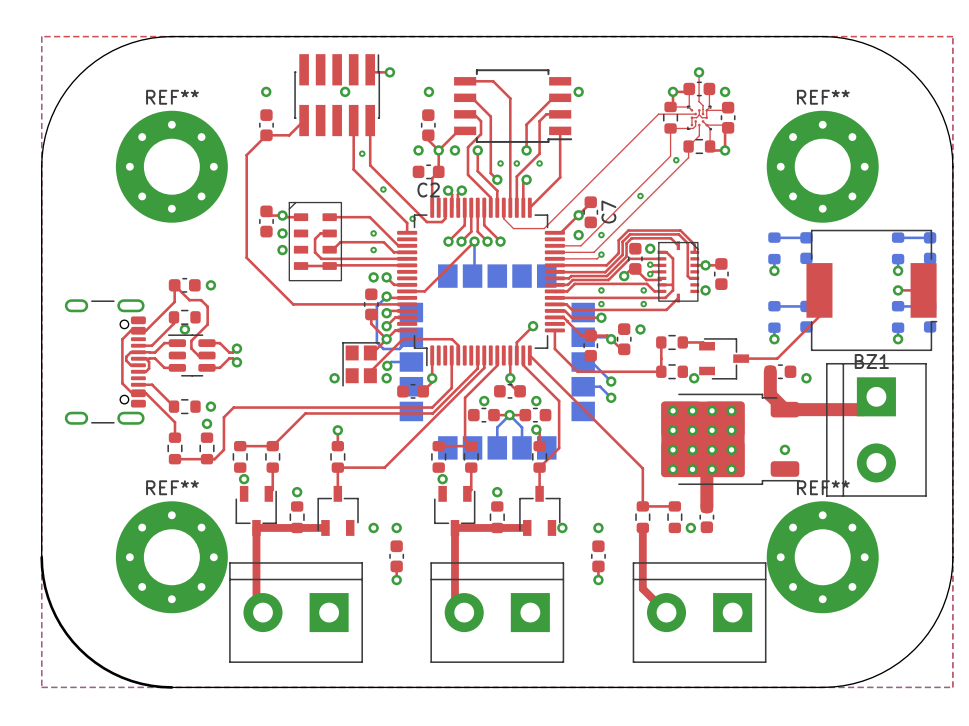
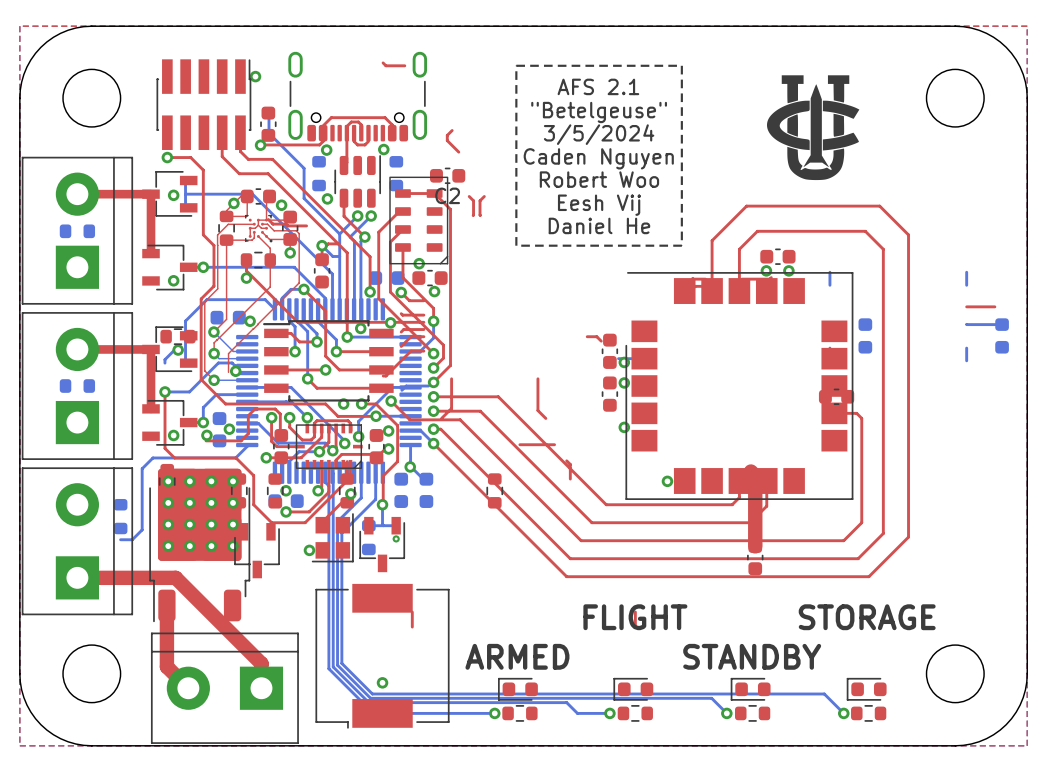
board edge: (171, 36) (151, 38) (122, 46) (95, 61) (79, 74) (66, 90) (51, 116) (43, 146) (41, 166) -> (163, 26) (75, 28) (60, 33) (40, 47) (26, 66) (21, 82) (19, 170)
board edge: (822, 36) (853, 40) (872, 46) (890, 55) (914, 74) (933, 98) (942, 116) (949, 136) (952, 166) -> (883, 26) (971, 28) (993, 37) (1006, 47) (1016, 59) (1025, 82) (1027, 170)
part footprint: [294, 54, 381, 137] -> [288, 51, 428, 142]
via: (389, 72) -> none
line: none -> (516, 65) (681, 65) (681, 245) (516, 245) (516, 65)
top track: (699, 72) (699, 101) (703, 105) (703, 114) -> none
via: (699, 72) -> none
round board edge: none -> [62, 68, 122, 128]
round board edge: none -> [925, 68, 985, 128]
drawing: none -> [766, 75, 860, 181]
top track: (465, 81) (493, 81) (510, 98) (510, 207) -> none
part: (699, 88) -> none
top track: (709, 88) (709, 107) (706, 110) -> none
via position: (266, 91) -> (255, 76)
via: (345, 91) -> none
via: (428, 91) -> none
text: none -> AFS 2.1 (598, 86)
via: (578, 91) -> none
via: (673, 91) -> none
via: (725, 91) -> none
top track: (465, 97) (471, 97) (490, 116) (490, 173) (497, 179) -> none
top track: (560, 97) (553, 97) (526, 124) (526, 150) -> none
part rotation: 0° (513, 106) -> 180° (328, 360)
part position: (513, 106) -> (328, 360)
part: none -> (203, 104)
top track: (689, 107) (689, 88) (686, 91) (673, 91) (673, 104) (670, 106) (688, 106) (691, 110) -> none
top track: (728, 107) (725, 110) (706, 110) -> none
top track: (699, 110) (699, 114) -> none
top track: (706, 110) (706, 117) (702, 117) (699, 114) -> none
top track: (465, 114) (474, 114) (481, 121) (481, 134) (468, 147) (468, 174) (490, 197) (490, 207) -> none
top track: (560, 114) (546, 114) (539, 121) (539, 153) (516, 176) (516, 207) -> none
text: none -> "Betelgeuse" (599, 112)
top track: (695, 114) (658, 114) (544, 228) (513, 228) (503, 218) (503, 207) -> none
top track: (699, 114) (696, 117) (691, 117) (691, 125) -> none
bottom track: none -> (269, 112) (269, 133) (304, 168) (304, 198) (339, 234)
part: (670, 117) -> none
part: (728, 117) -> none
part: (699, 118) -> none
top track: (304, 120) (289, 135) (266, 135) (246, 155) (246, 248) -> none
top track: (353, 120) (353, 169) (407, 223) (407, 232) -> none
top track: (370, 120) (370, 165) (426, 222) (441, 222) (445, 218) (445, 207) -> none
top track: (695, 121) (695, 126) (693, 128) (670, 128) (670, 156) (580, 245) (554, 245) -> none
top track: (703, 121) (710, 128) (710, 146) (714, 150) (725, 150) (725, 130) (728, 127) (725, 125) (706, 125) -> none
part side: top (428, 125) -> bottom (386, 278)
top track: (699, 125) (699, 135) (688, 146) (688, 157) (593, 252) (554, 252) -> none
top track: none -> (323, 125) (331, 117) (385, 117) (392, 124) (392, 133)
top track: (465, 130) (458, 130) (438, 150) (438, 171) (432, 178) (432, 207) -> none
top track: (560, 130) (560, 177) (529, 207) -> none
top track: none -> (222, 132) (222, 156) (239, 173) (268, 173) (347, 252) (347, 337)
top track: none -> (240, 132) (240, 151) (248, 159) (272, 159) (370, 256) (370, 291)
top track: none -> (323, 133) (323, 141) (319, 144) (260, 145)
top track: none -> (354, 133) (354, 141) (357, 144) (364, 144) (368, 141)
top track: none -> (361, 133) (361, 124) (358, 121) (351, 121) (346, 126) (346, 162) (344, 165)
text: none -> 3/5/2024 (599, 134)
via: none -> (260, 145)
part: (699, 146) -> none
via: none -> (326, 150)
via: none -> (383, 149)
via: (418, 150) -> none
via: (438, 150) -> none
via: (454, 150) -> none
top track: (477, 150) (477, 171) (497, 190) (497, 207) -> none
via: (477, 150) -> none
via: (526, 150) -> none
via: (725, 150) -> none
via: (362, 153) -> none
top track: none -> (167, 157) (190, 157) (203, 170) (203, 234) (213, 245) (213, 286) (201, 298) (201, 379) (225, 404) (325, 404) (338, 416) (375, 416)
via: none -> (167, 157)
text: none -> Caden Nguyen (598, 158)
via: (676, 160) -> none
via: (500, 163) -> none
via: (516, 163) -> none
via: (539, 163) -> none
REF**: (171, 166) -> none
REF**: (822, 166) -> none
part: none -> (396, 173)
text: none -> Robert Woo (599, 179)
bottom track: none -> (185, 180) (185, 207)
via: (497, 179) -> none
top track: (526, 179) (523, 183) (523, 207) -> none
via: (526, 179) -> none
top track: none -> (402, 193) (434, 193) (450, 209) (450, 365) (433, 382)
top track: none -> (77, 194) (151, 194) (151, 253)
part: none -> (169, 193)
bottom track: none -> (185, 194) (252, 194) (332, 274) (332, 309)
via: none -> (173, 195)
via: (383, 189) -> none
top track: none -> (240, 196) (226, 210) (226, 216) (247, 215) (247, 196) (240, 196)
part: none -> (258, 196)
top track: none -> (269, 196) (266, 199) (266, 220)
via: (448, 190) -> none
via: (461, 190) -> none
via: none -> (327, 198)
top track: none -> (344, 198) (344, 216) (364, 237)
via: none -> (233, 203)
via: (640, 196) -> none
via: none -> (281, 205)
text: none -> Eesh Vij (599, 205)
top track: (590, 202) (560, 232) (554, 232) -> none
top track: none -> (402, 211) (399, 211) (378, 232) (378, 298) (433, 353)
part footprint: [259, 205, 274, 238] -> [245, 214, 273, 243]
top track: (464, 207) (464, 225) (448, 241) -> none
top track: (471, 207) (471, 231) (461, 241) -> none
top track: (477, 207) (477, 231) (487, 241) -> none
top track: (484, 207) (484, 225) (500, 241) -> none
bottom track: none -> (357, 216) (339, 234)
via: none -> (357, 216)
bottom track: none -> (371, 216) (350, 237) (354, 241) (354, 309)
via: none -> (371, 216)
top track: none -> (290, 217) (287, 220) (258, 220) (258, 225)
C7: (590, 212) -> none
top track: none -> (254, 224) (228, 224) (217, 235) (217, 245)
top track: none -> (262, 224) (267, 224) (274, 230) (296, 230) (299, 233) (299, 282) (228, 353) (228, 372)
via: (282, 215) -> none
via: (578, 215) -> none
top track: none -> (258, 225) (261, 228) (266, 228)
top track: none -> (258, 225) (255, 228) (250, 228) (250, 236)
top track: (329, 217) (369, 217) (398, 245) (407, 245) -> none
text: none -> Daniel He (599, 225)
via: (412, 218) -> none
part: none -> (226, 228)
part: none -> (290, 228)
top track: none -> (402, 229) (390, 242) (390, 292) (443, 345) (443, 358) (433, 368)
part: none -> (77, 230)
part: none -> (77, 231)
top track: none -> (254, 232) (254, 237) (252, 240) (226, 240) (226, 319) (213, 332)
top track: none -> (262, 232) (269, 239) (290, 239) (290, 252)
bottom track: none -> (339, 234) (339, 309)
top track: none -> (258, 236) (270, 248) (270, 286) (217, 339)
via: none -> (364, 237)
bottom track: none -> (360, 241) (360, 309)
via: (282, 233) -> none
via: (373, 233) -> none
top track: none -> (217, 245) (217, 288) (204, 301) (204, 370) (214, 380)
bottom track: none -> (322, 245) (332, 256) (339, 256)
via: none -> (322, 245)
via: (578, 235) -> none
via: (601, 235) -> none
top track: none -> (402, 247) (402, 277) (433, 308) (433, 321)
bottom track: (774, 237) (806, 237) -> none
bottom track: (898, 237) (930, 237) -> none
via: none -> (290, 252)
part rotation: 0° (315, 241) -> 180° (418, 220)
part position: (315, 241) -> (418, 220)
via: (448, 241) -> none
via: (461, 241) -> none
top track: (474, 241) (424, 291) (407, 291) -> none
bottom track: (474, 241) (474, 274) (472, 276) -> none
via: (474, 241) -> none
via: (487, 241) -> none
via: (500, 241) -> none
top track: (678, 245) (671, 238) (631, 238) (626, 243) (626, 256) (606, 276) (571, 276) (568, 278) (554, 278) -> none
top track: (315, 247) (315, 252) (321, 258) (407, 258) -> none
part: none -> (258, 260)
via: (650, 248) -> none
part: (774, 248) -> none
part: (806, 248) -> none
part: (898, 248) -> none
part: (930, 248) -> none
top track: (329, 249) (332, 249) (340, 242) (383, 242) (393, 252) (407, 252) -> none
via: (282, 250) -> none
via: (373, 250) -> none
via: none -> (419, 263)
top track: (661, 252) (666, 252) (673, 258) (673, 290) (665, 297) (554, 297) -> none
top track: (694, 252) (694, 244) (680, 230) (628, 230) (618, 240) (618, 253) (606, 265) (554, 265) -> none
part: none -> (169, 267)
bottom track: none -> (185, 267) (294, 267) (325, 298) (325, 309)
via: none -> (203, 267)
top track: (601, 254) (597, 258) (554, 258) -> none
via: (601, 254) -> none
part: none -> (322, 270)
via: none -> (788, 270)
part: (635, 258) -> none
top track: (661, 258) (629, 258) (608, 279) (572, 279) (567, 284) (554, 284) -> none
via: none -> (246, 278)
part: none -> (430, 278)
via: (650, 264) -> none
top track: (407, 265) (301, 265) -> none
via position: (705, 265) -> (766, 270)
via: none -> (173, 280)
via: (774, 270) -> none
via: (898, 270) -> none
top track: (547, 271) (605, 272) (622, 254) (622, 241) (630, 234) (678, 234) (687, 243) (687, 276) (694, 278) -> none
part: (678, 271) -> none
top track: none -> (303, 289) (325, 311) (325, 356) (339, 369) (381, 369)
bottom track: none -> (303, 289) (290, 289) (282, 298) (282, 309)
via: none -> (303, 289)
via: (650, 274) -> none
part rotation: 0° (721, 274) -> 90° clockwise (777, 256)
part position: (721, 274) -> (777, 256)
via: none -> (370, 291)
via: none -> (434, 291)
top track: (624, 276) (631, 268) (635, 268) (646, 279) (661, 278) -> none
via: (624, 276) -> none
top track: none -> (712, 291) (712, 240) (746, 206) (879, 206) (908, 234) (908, 537) (868, 576) (566, 576) (433, 443)
top track: none -> (739, 291) (739, 249) (757, 231) (865, 231) (883, 249) (883, 533) (858, 558) (570, 558) (440, 429) (433, 429)
via: (373, 277) -> none
part side: top (481, 282) -> bottom (328, 391)
top track: (661, 284) (672, 284) -> none
part: (184, 285) -> none
via: (210, 285) -> none
via: (601, 290) -> none
via: (643, 290) -> none
via: (705, 290) -> none
top track: (819, 290) (819, 316) (777, 358) (741, 358) -> none
BZ1: (871, 290) -> none
via: (898, 290) -> none
top track: (661, 291) (654, 291) (646, 283) (574, 283) (567, 291) (555, 292) -> none
bottom track: none -> (274, 309) (265, 299) (206, 299) (185, 321) (185, 363)
bottom track: none -> (289, 309) (289, 320) (295, 326) (295, 351)
bottom track: none -> (296, 309) (296, 320) (307, 331) (307, 378)
bottom track: none -> (303, 309) (303, 320) (317, 333) (317, 341)
bottom track: none -> (318, 309) (318, 321) (336, 339) (336, 351)
bottom track: (386, 296) (376, 306) (376, 342) (383, 348) (399, 348) (411, 337) -> none
via: (386, 296) -> none
top track: (678, 298) (666, 309) (572, 309) (566, 304) (554, 304) -> none
part: none -> (228, 317)
via: none -> (250, 321)
bottom track: none -> (433, 321) (433, 338) (420, 351) (410, 351)
via: none -> (433, 321)
part side: top (371, 304) -> bottom (401, 490)
via: none -> (390, 322)
via: (601, 304) -> none
via: (643, 304) -> none
bottom track: (774, 306) (806, 306) -> none
via: none -> (360, 328)
top track: (554, 310) (564, 310) (571, 317) (601, 317) -> none
bottom track: none -> (213, 332) (233, 351) (247, 351)
via: none -> (213, 332)
via: (386, 313) -> none
top track: none -> (276, 333) (291, 333) (299, 341) (317, 341)
top track: (371, 314) (371, 323) (386, 339) -> none
bottom track: none -> (347, 335) (410, 337)
part: (774, 316) -> none
part: (898, 316) -> none
top track: (174, 317) (174, 323) (151, 345) (138, 345) -> none
via: none -> (347, 337)
via: (601, 317) -> none
top track: none -> (217, 339) (214, 342) (214, 353)
top track: (567, 321) (581, 335) (607, 335) (621, 349) (624, 349) -> none
via: none -> (317, 341)
via: (386, 326) -> none
top track: (533, 326) (516, 342) (516, 355) -> none
via: (533, 326) -> none
top track: none -> (77, 349) (151, 349) (151, 408)
part: none -> (169, 349)
bottom track: none -> (174, 350) (164, 359) (164, 363)
via: (640, 329) -> none
via: none -> (295, 351)
top track: none -> (336, 351) (381, 351)
via: none -> (336, 351)
top track: (554, 330) (554, 348) (577, 371) (661, 371) (661, 342) -> none
part: none -> (609, 351)
bottom track: none -> (214, 353) (219, 358) (247, 358)
via: none -> (214, 353)
via: none -> (433, 353)
via: (386, 339) -> none
via: (611, 339) -> none
part: (624, 339) -> none
via: (774, 339) -> none
via: (898, 339) -> none
via: none -> (624, 362)
part: (672, 342) -> none
top track: (682, 342) (703, 342) (707, 346) -> none
top track: (177, 343) (164, 343) (154, 352) (130, 352) (126, 356) (126, 360) (130, 365) (138, 365) -> none
top track: (206, 343) (219, 343) (229, 352) (233, 352) (236, 348) -> none
bottom track: none -> (247, 365) (218, 362) (189, 391) (165, 391)
via: none -> (433, 368)
part: (590, 345) -> none
top track: none -> (276, 369) (325, 369)
via: none -> (325, 369)
part rotation: 0° (191, 355) -> 90° clockwise (357, 181)
part position: (191, 355) -> (357, 181)
top track: (206, 355) (198, 355) (191, 348) (191, 340) (207, 324) (207, 306) (201, 300) (189, 300) (174, 285) (174, 301) (145, 330) (130, 330) (122, 339) (122, 383) (132, 393) (145, 393) (174, 422) (174, 437) -> none
top track: none -> (307, 378) (317, 388) (381, 388)
via: none -> (307, 378)
top track: (451, 355) (451, 388) (432, 407) (233, 407) (223, 417) (223, 449) (214, 459) (174, 459) -> none
top track: (458, 355) (458, 345) (452, 339) (402, 339) (370, 371) (370, 375) -> none
top track: (477, 355) (477, 368) (432, 413) (305, 413) (272, 446) (240, 446) -> none
top track: (484, 355) (484, 368) (384, 467) (337, 467) (337, 493) -> none
top track: (497, 355) (497, 365) (465, 397) (465, 439) (471, 446) (438, 446) -> none
top track: (523, 355) (523, 365) (559, 401) (559, 448) (539, 467) (539, 493) -> none
top track: (529, 355) (642, 468) (642, 506) (674, 506) -> none
bottom track: none -> (214, 380) (247, 380)
via: none -> (214, 380)
top track: (138, 358) (154, 358) (164, 367) (177, 367) -> none
top track: (145, 358) (149, 361) (149, 368) (145, 371) (138, 371) -> none
via: none -> (433, 382)
part: (724, 358) -> none
via: none -> (624, 382)
part: none -> (77, 386)
part: none -> (77, 386)
part: (105, 362) -> none
top track: (236, 362) (233, 358) (229, 358) (219, 367) (206, 367) -> none
via: (236, 362) -> none
part side: bottom (497, 362) -> top (739, 386)
bottom track: (583, 362) (591, 362) (611, 381) -> none
bottom track: none -> (247, 387) (291, 387) (344, 441) (344, 443)
bottom track: none -> (410, 387) (392, 387) (358, 421) (358, 436)
part rotation: 0° (361, 364) -> 180° (332, 537)
part position: (361, 364) -> (332, 537)
via: (387, 365) -> none
top track: none -> (165, 391) (165, 448) (174, 457) (236, 457) (253, 475) (253, 504) (271, 522) (305, 522) (350, 477) (350, 464)
via: none -> (165, 391)
bottom track: none -> (247, 394) (216, 394) (203, 407) (203, 422) (188, 422)
part: none -> (609, 394)
top track: none -> (433, 396) (498, 396) (606, 504) (732, 504) (739, 497) (739, 481)
via: none -> (433, 396)
part: (672, 371) -> none
top track: (770, 371) (770, 394) (784, 409) (863, 409) (876, 396) -> none
top track: none -> (391, 401) (409, 419) (460, 419) (581, 540) (843, 540) (861, 522) (861, 418) (856, 413) (834, 413)
via: none -> (391, 401)
bottom track: none -> (247, 401) (291, 401) (307, 417)
top track: none -> (361, 404) (376, 404) (397, 425) (397, 461) (383, 475) (383, 504)
via: none -> (361, 404)
via: (386, 378) -> none
via: (432, 378) -> none
via: (510, 378) -> none
via: (694, 378) -> none
via: (806, 378) -> none
via: (611, 381) -> none
top track: (138, 384) (152, 384) (174, 406) -> none
top track: none -> (433, 411) (480, 411) (591, 522) (750, 522) (766, 506) (766, 478)
via: none -> (433, 411)
bottom track: (583, 386) (600, 386) (611, 397) -> none
bottom track: none -> (376, 416) (410, 416)
via: none -> (376, 416)
top track: none -> (271, 417) (271, 441) (276, 446) (299, 446)
via: none -> (271, 417)
via: none -> (289, 417)
via: none -> (307, 417)
top track: none -> (289, 418) (289, 427) (302, 439) (311, 439) (314, 436) (314, 423) (317, 420) (347, 420) (350, 423) (350, 428)
part side: top (413, 391) -> bottom (426, 490)
part: (509, 391) -> none
part: none -> (169, 422)
via: none -> (203, 422)
bottom track: none -> (247, 423) (258, 423) (278, 443) (325, 443) (332, 450)
via: (611, 397) -> none
via: none -> (624, 427)
top track: none -> (321, 428) (321, 437) (301, 457) (266, 457)
top track: none -> (328, 428) (328, 442) (319, 451)
top track: none -> (336, 428) (336, 447) (332, 450)
part: none -> (219, 429)
via: none -> (229, 429)
via: none -> (433, 429)
via: (484, 401) -> none
via: (536, 401) -> none
via: none -> (388, 430)
bottom track: none -> (410, 430) (420, 430) (433, 443)
via: none -> (173, 435)
part side: top (184, 406) -> bottom (319, 173)
top track: none -> (281, 435) (280, 414) (275, 409) (254, 409) (248, 415) (248, 433) (241, 440) (206, 440)
via: none -> (358, 436)
via: (673, 410) -> none
via: (692, 410) -> none
via: (712, 410) -> none
via: (731, 410) -> none
via: none -> (344, 443)
via: none -> (433, 443)
bottom track: none -> (247, 445) (235, 457) (152, 457) (142, 468) (142, 529) (132, 539) (120, 539)
bottom track: none -> (410, 445) (410, 466) (423, 479) (426, 479)
part: (483, 415) -> none
via: (509, 415) -> none
part side: top (535, 415) -> bottom (286, 501)
part: none -> (281, 446)
part: none -> (328, 446)
part: none -> (376, 446)
top track: none -> (388, 448) (385, 448) (376, 457) (373, 454) (341, 454) (336, 460) (336, 464)
via: none -> (388, 448)
via: none -> (332, 450)
bottom track: none -> (319, 451) (299, 451) (289, 461) (289, 472)
via: none -> (319, 451)
via: (207, 423) -> none
via: none -> (266, 457)
via: (536, 429) -> none
part: (876, 429) -> none
via: (337, 430) -> none
via: (673, 430) -> none
via: (692, 430) -> none
via: (712, 430) -> none
via: (731, 430) -> none
top track: none -> (321, 464) (321, 487) (318, 490)
top track: none -> (328, 464) (328, 492) (309, 511) (286, 511)
via: none -> (410, 466)
part: (730, 439) -> none
bottom track: none -> (325, 472) (325, 482) (328, 485) (328, 668) (373, 713) (494, 713)
bottom track: none -> (332, 472) (333, 667) (368, 702) (566, 702) (577, 713) (609, 713)
bottom track: none -> (361, 472) (361, 497) (337, 521) (337, 665) (370, 698) (711, 698) (726, 713)
bottom track: none -> (375, 472) (375, 499) (341, 533) (341, 663) (372, 693) (824, 693) (843, 713)
bottom track: (497, 447) (497, 427) (509, 415) (522, 427) (522, 447) -> none
via: none -> (168, 481)
via: none -> (189, 481)
part: (207, 448) -> none
via: none -> (211, 481)
via: none -> (233, 481)
via: none -> (667, 481)
via: (673, 449) -> none
via: (692, 449) -> none
via: (712, 449) -> none
via: (731, 449) -> none
via: (784, 449) -> none
via: none -> (286, 490)
via: none -> (318, 490)
part: (438, 456) -> none
part: (539, 456) -> none
top track: none -> (350, 493) (322, 521) (322, 525)
via: none -> (350, 493)
via: none -> (168, 502)
via: none -> (189, 502)
via: none -> (211, 502)
via: none -> (233, 502)
top track: (272, 467) (272, 489) (268, 493) -> none
top track: (471, 467) (471, 489) (467, 493) -> none
bottom track: none -> (382, 504) (383, 525)
via: none -> (382, 504)
via: (673, 469) -> none
via: (692, 469) -> none
via: (712, 469) -> none
via: (731, 469) -> none
via: none -> (286, 511)
via position: (244, 479) -> (233, 524)
via: (442, 479) -> none
part: none -> (120, 516)
via: none -> (168, 524)
via: none -> (189, 524)
via: none -> (211, 524)
bottom track: none -> (368, 525) (396, 525)
via: (297, 492) -> none
via: (497, 492) -> none
part: none -> (368, 537)
via: none -> (396, 538)
part: none -> (77, 541)
via: none -> (168, 546)
via: none -> (189, 546)
part: none -> (199, 545)
via: none -> (211, 546)
via: none -> (233, 546)
via: none -> (309, 550)
part rotation: 0° (338, 510) -> 180° (382, 544)
part position: (338, 510) -> (382, 544)
part: (454, 510) -> none
part: (539, 510) -> none
part: (297, 517) -> none
part: (497, 517) -> none
part: (642, 517) -> none
part: (674, 517) -> none
top track: (325, 527) (256, 527) (256, 606) (262, 612) -> none
via: (373, 527) -> none
via: (396, 527) -> none
top track: (527, 527) (454, 527) (454, 603) (464, 612) -> none
via: (562, 527) -> none
via: (598, 527) -> none
top track: (642, 527) (642, 588) (666, 612) -> none
via: (690, 527) -> none
top track: none -> (77, 577) (175, 577) (261, 663) (261, 688)
part: (396, 556) -> none
part: (598, 556) -> none
board edge: (41, 557) (45, 587) (51, 607) (60, 625) (79, 649) (95, 662) (122, 677) (141, 683) (171, 687) -> (19, 601) (21, 689) (30, 712) (40, 724) (60, 738) (75, 744) (163, 745)
REF**: (171, 557) -> none
REF**: (822, 557) -> none
board edge: (952, 557) (949, 587) (942, 607) (928, 633) (914, 649) (890, 668) (872, 677) (853, 683) (822, 687) -> (1027, 601) (1025, 689) (1016, 712) (1006, 724) (993, 734) (971, 744) (883, 745)
top track: none -> (166, 605) (166, 666) (188, 688)
text: none -> FLIGHT (635, 617)
text: none -> STORAGE (867, 617)
via: (396, 580) -> none
via: (598, 580) -> none
round board edge: none -> [62, 644, 122, 704]
round board edge: none -> [925, 644, 985, 704]
part: none -> (382, 656)
text: none -> ARMED (517, 656)
text: none -> STANDBY (752, 656)
part position: (296, 612) -> (224, 688)
part: (497, 612) -> none
part: (699, 612) -> none
via: none -> (382, 682)
part: none -> (517, 689)
part: none -> (633, 689)
part: none -> (750, 689)
part: none -> (866, 689)
via: none -> (494, 713)
part: none -> (519, 713)
via: none -> (609, 713)
part: none -> (635, 713)
via: none -> (726, 713)
part: none -> (752, 713)
via: none -> (843, 713)
part: none -> (868, 713)

